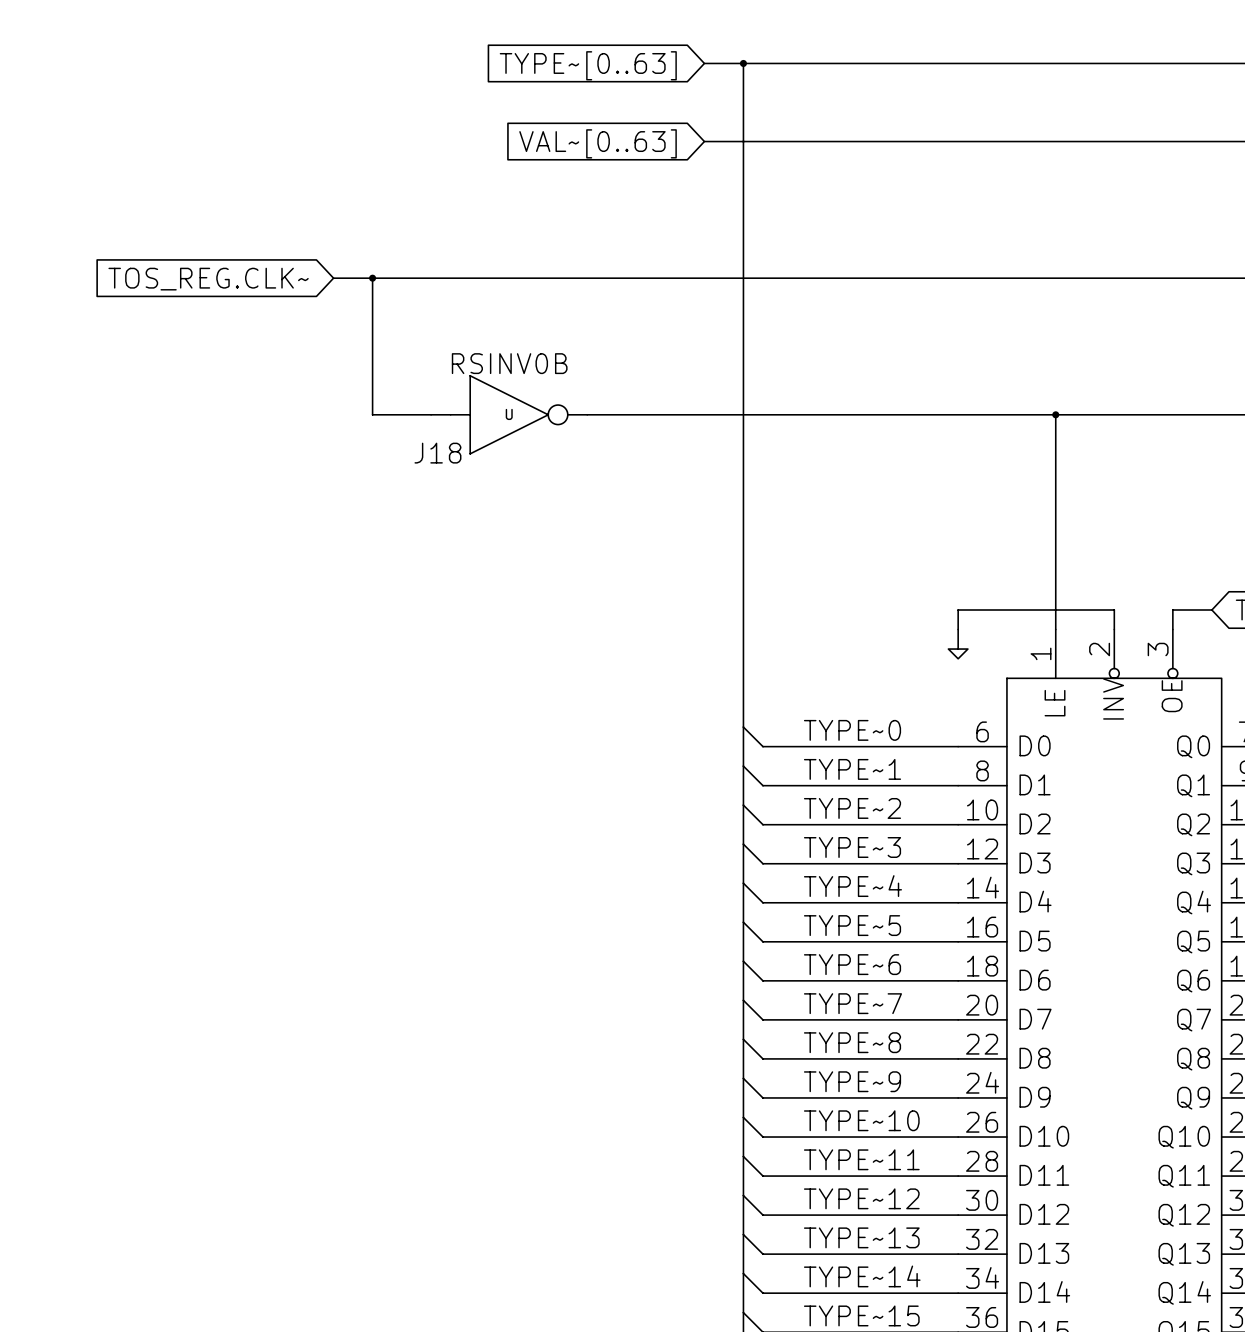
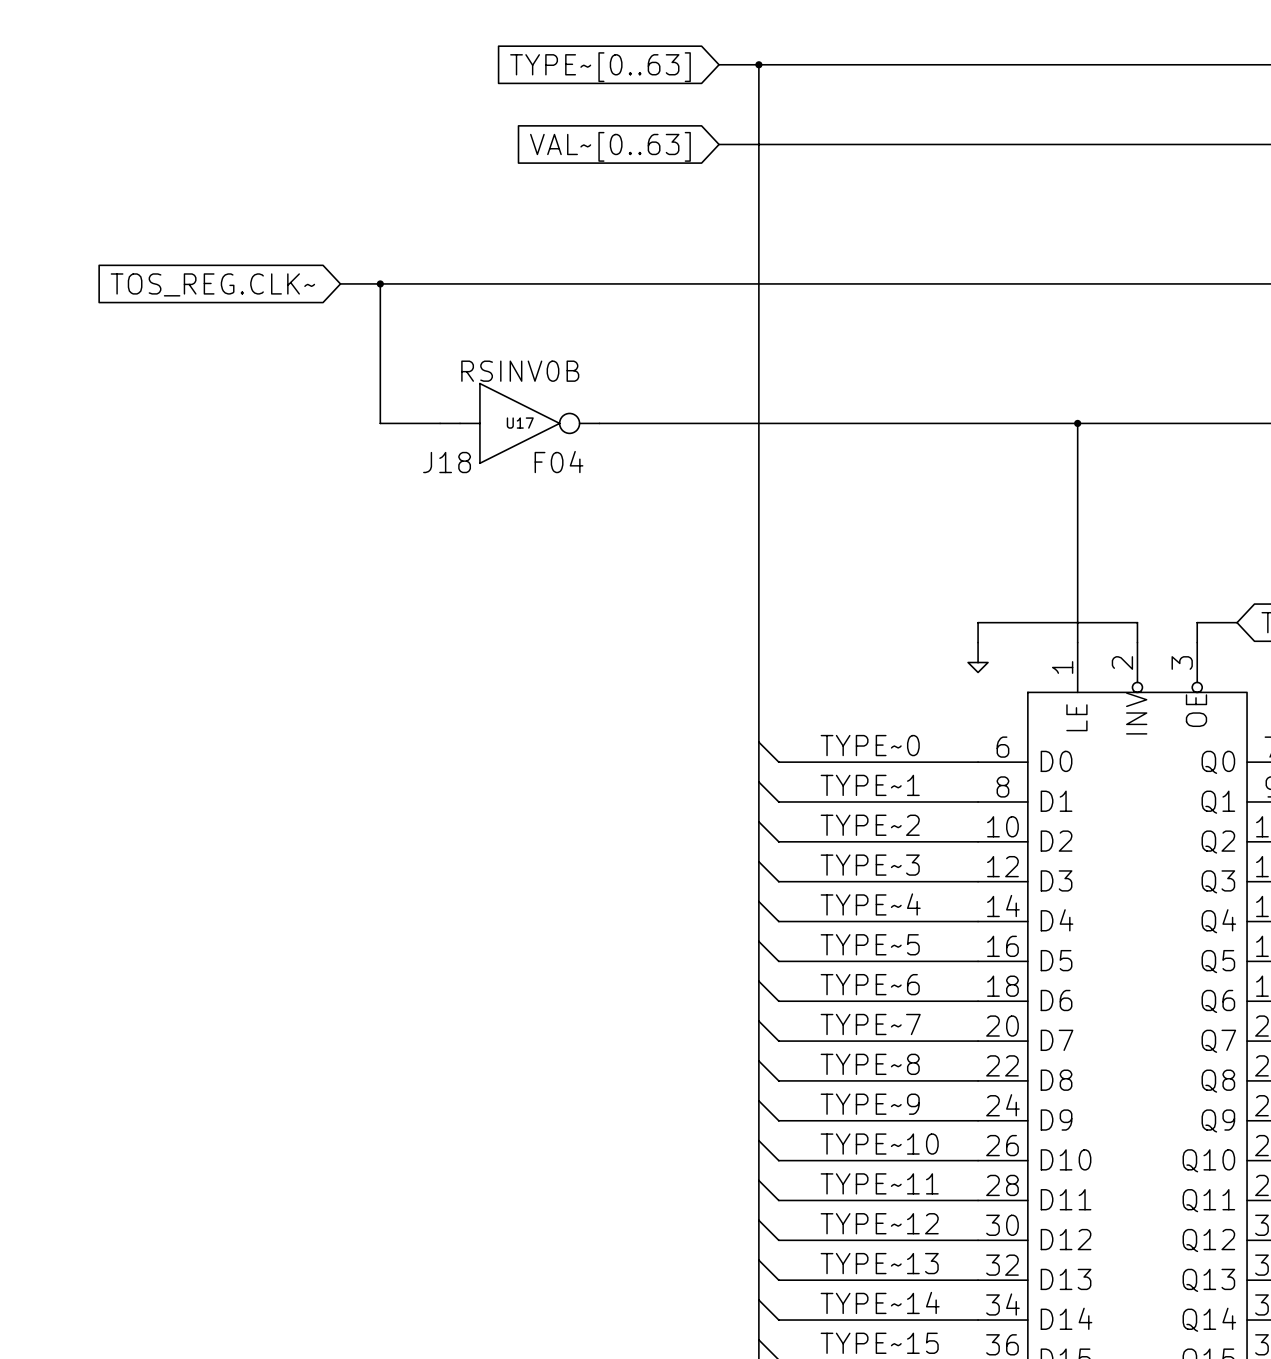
U name: U (509, 414) -> U17 (520, 423)
U value: none -> F04 (559, 462)

